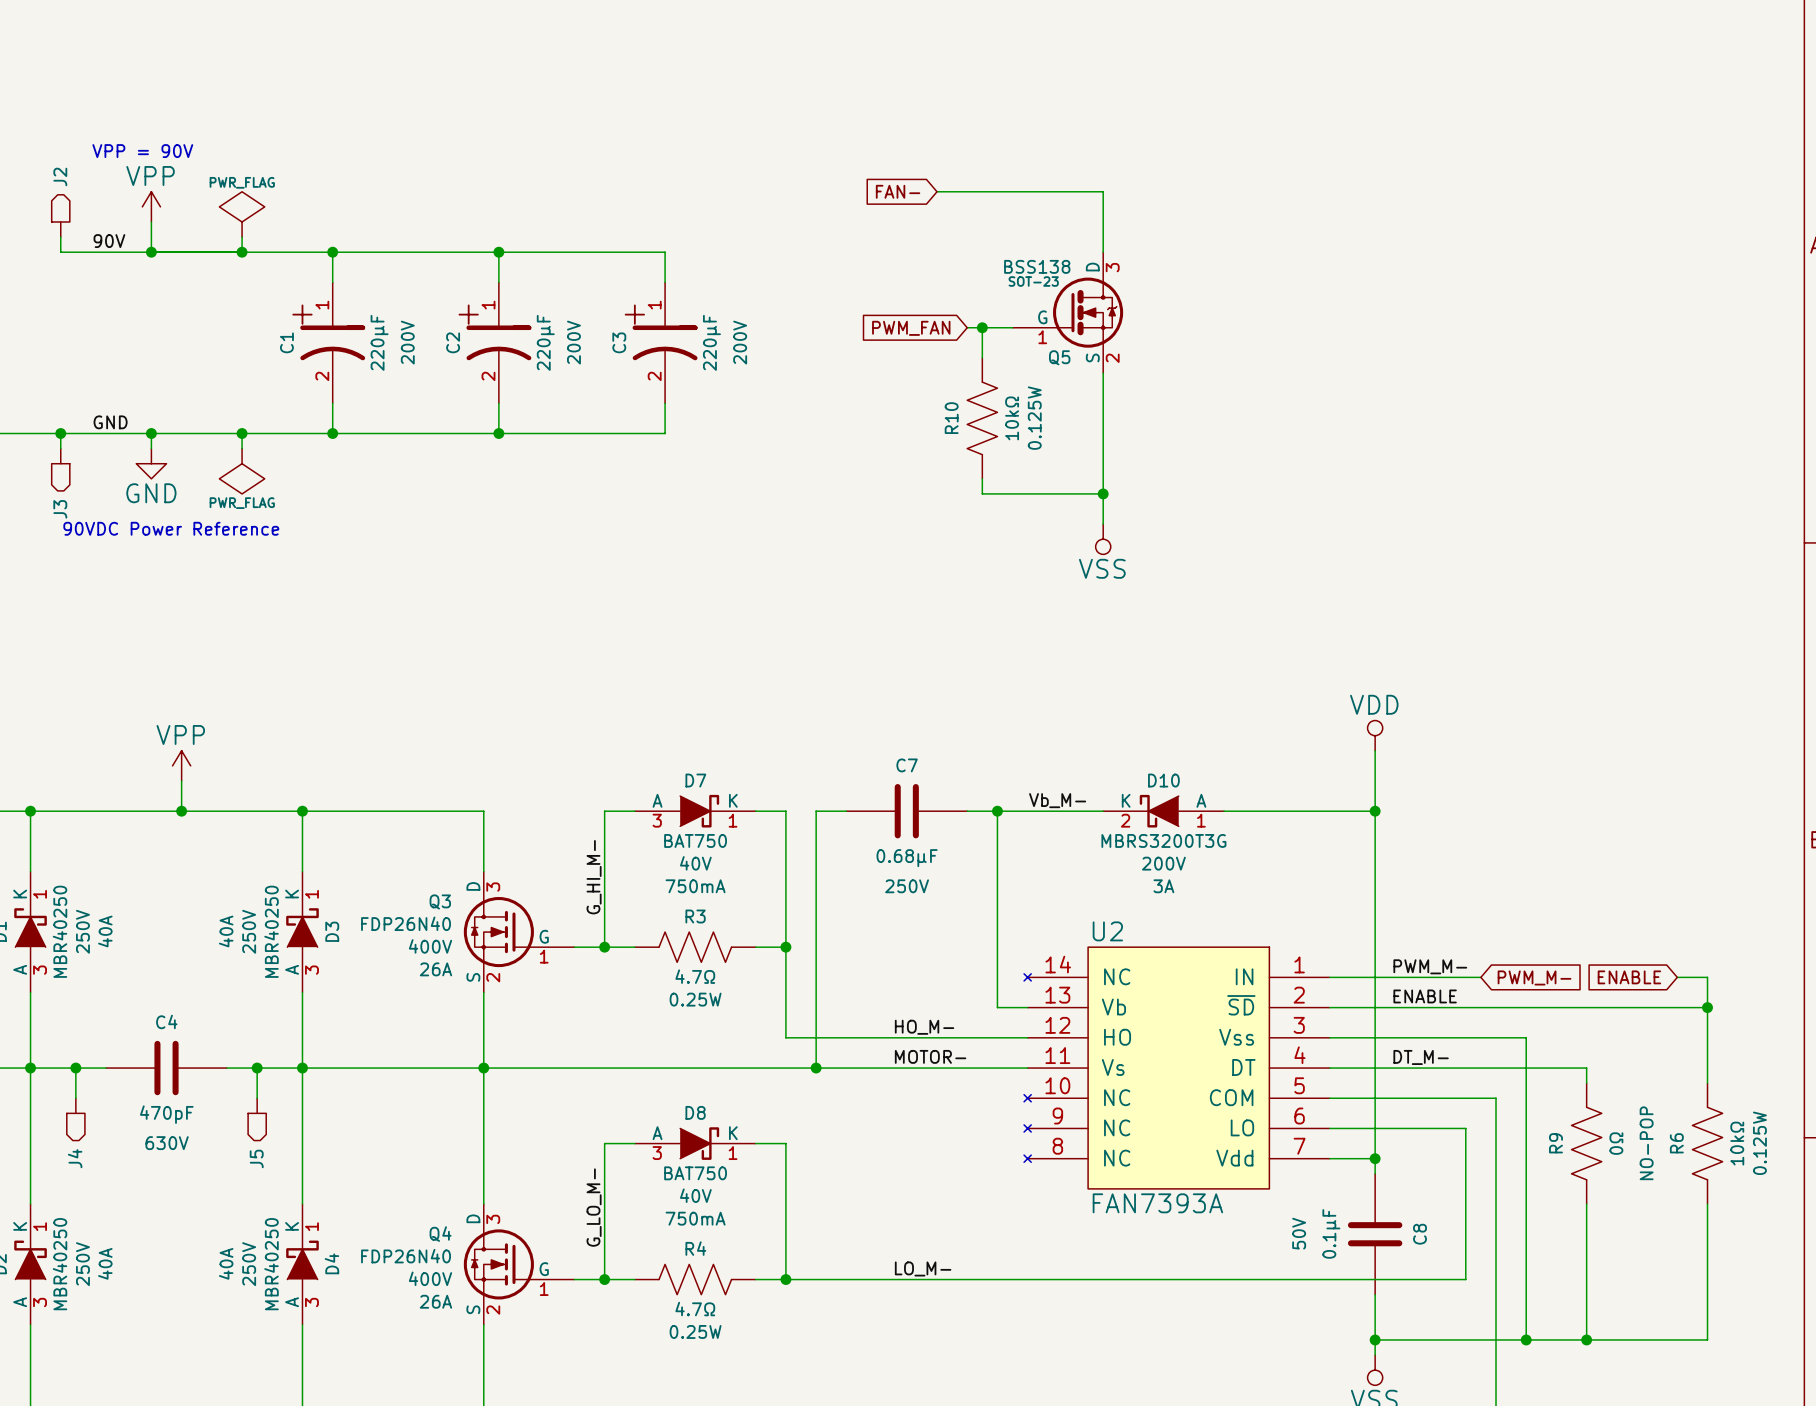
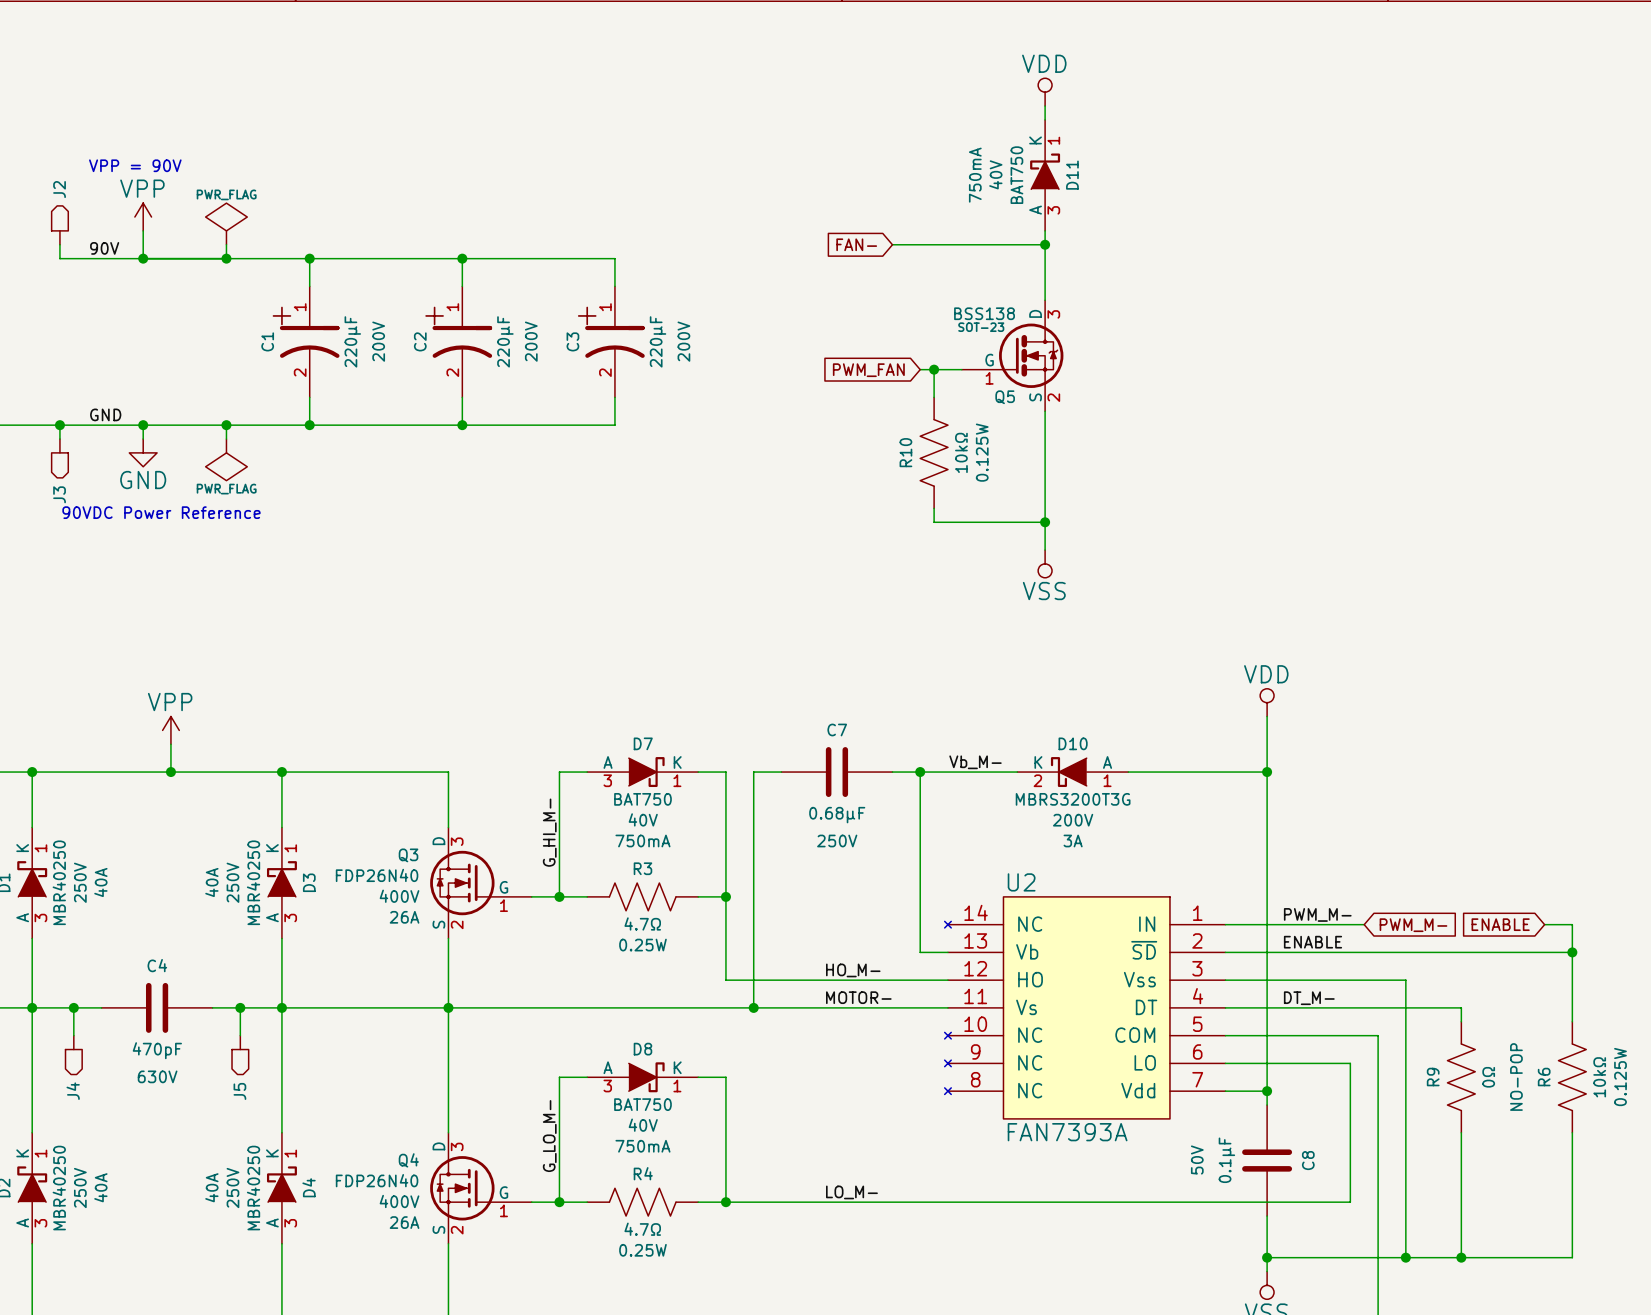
power symbol: none -> VDD (1045, 92)
wire: none -> (1045, 106) (1045, 119)
D11: none -> (1045, 175)
global label position: FAN- (898, 191) -> FAN- (856, 244)
wire: (937, 191) (1103, 191) (1103, 252) -> none
wire: none -> (1045, 230) (1045, 300)
wire: none -> (892, 244) (1045, 244)
junction: none -> (1045, 244)
Q5 position: (1067, 312) -> (1012, 355)
wire: (967, 327) (1012, 327) -> (920, 369) (961, 369)
wire: (982, 327) (982, 357) -> (934, 369) (934, 397)
junction position: (982, 327) -> (934, 369)
global label position: PWM_FAN (911, 328) -> PWM_FAN (868, 370)
wire: (1103, 373) (1103, 524) -> (1045, 411) (1045, 550)
R10 position: (982, 418) -> (934, 452)
wire: (982, 478) (982, 493) (1103, 493) -> (934, 508) (934, 522) (1045, 522)
junction position: (1103, 493) -> (1045, 522)
power symbol position: VSS (1103, 539) -> VSS (1045, 563)

